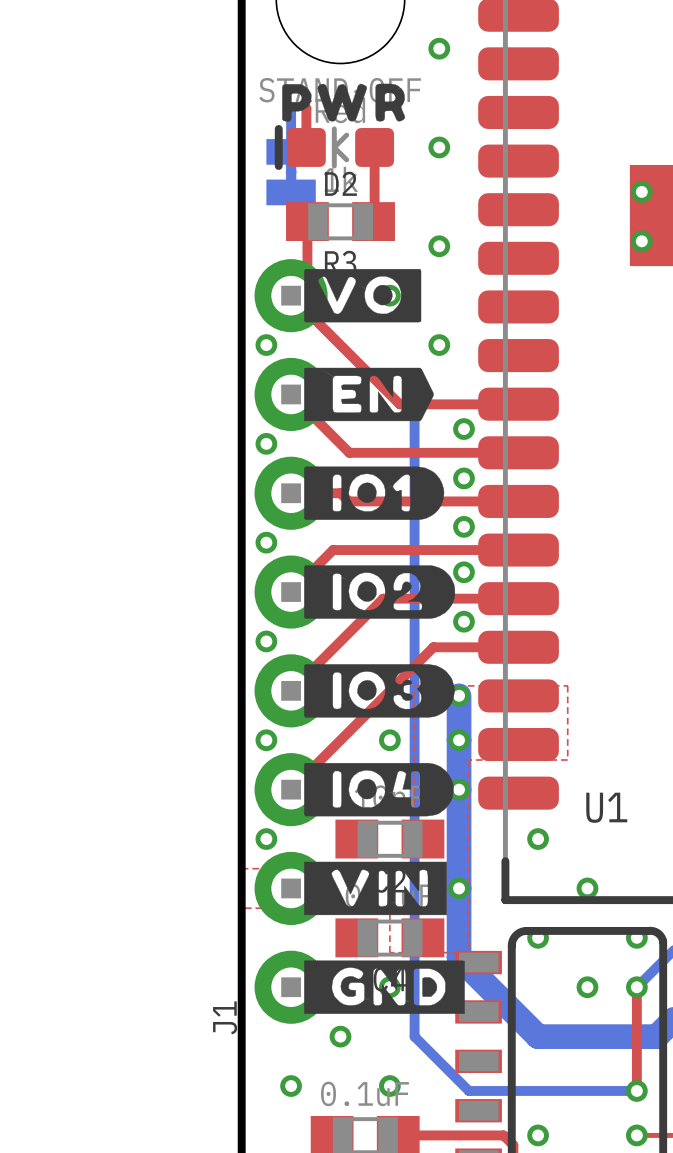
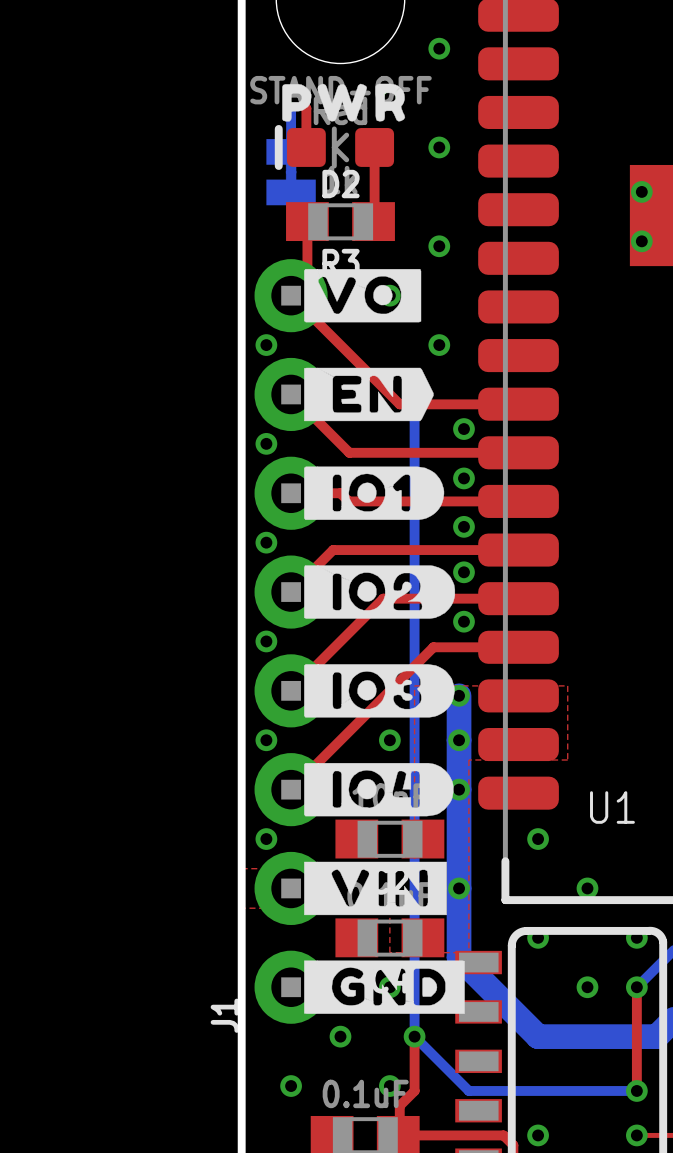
top track: none -> (414, 1036) (414, 1090) (399, 1105) (399, 1135)
via: none -> (414, 1036)

